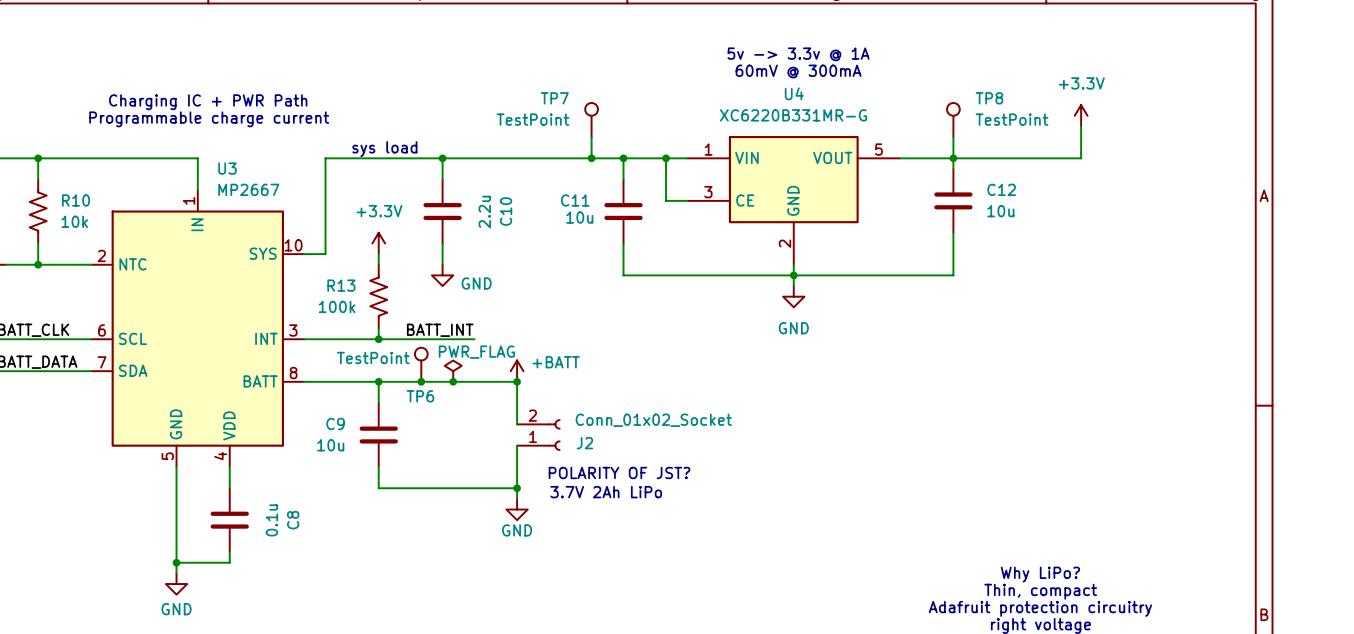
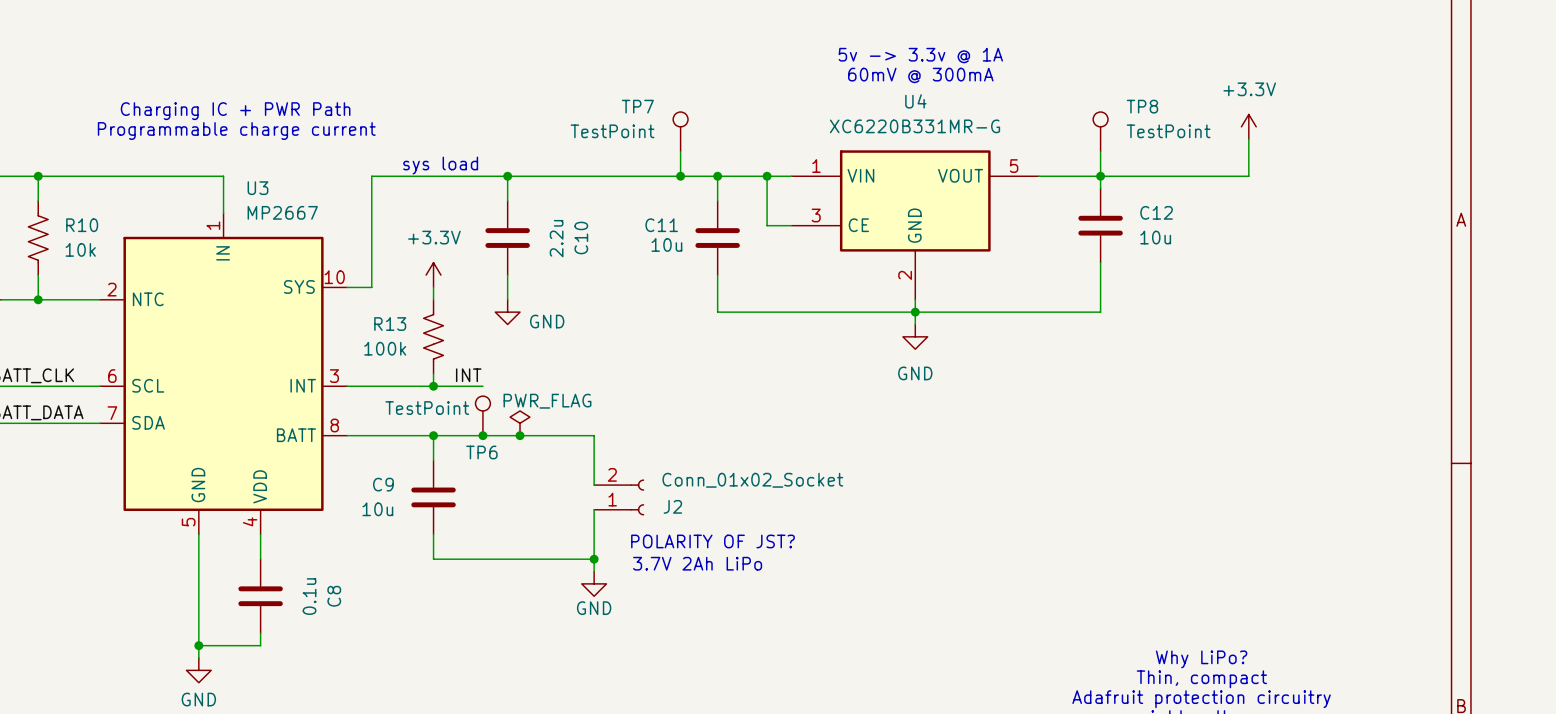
label: none -> INT (468, 375)
label: BATT_INT (440, 330) -> none
wire: (421, 339) (474, 339) -> none
power symbol: +BATT (517, 371) -> none
junction: (517, 381) -> none

